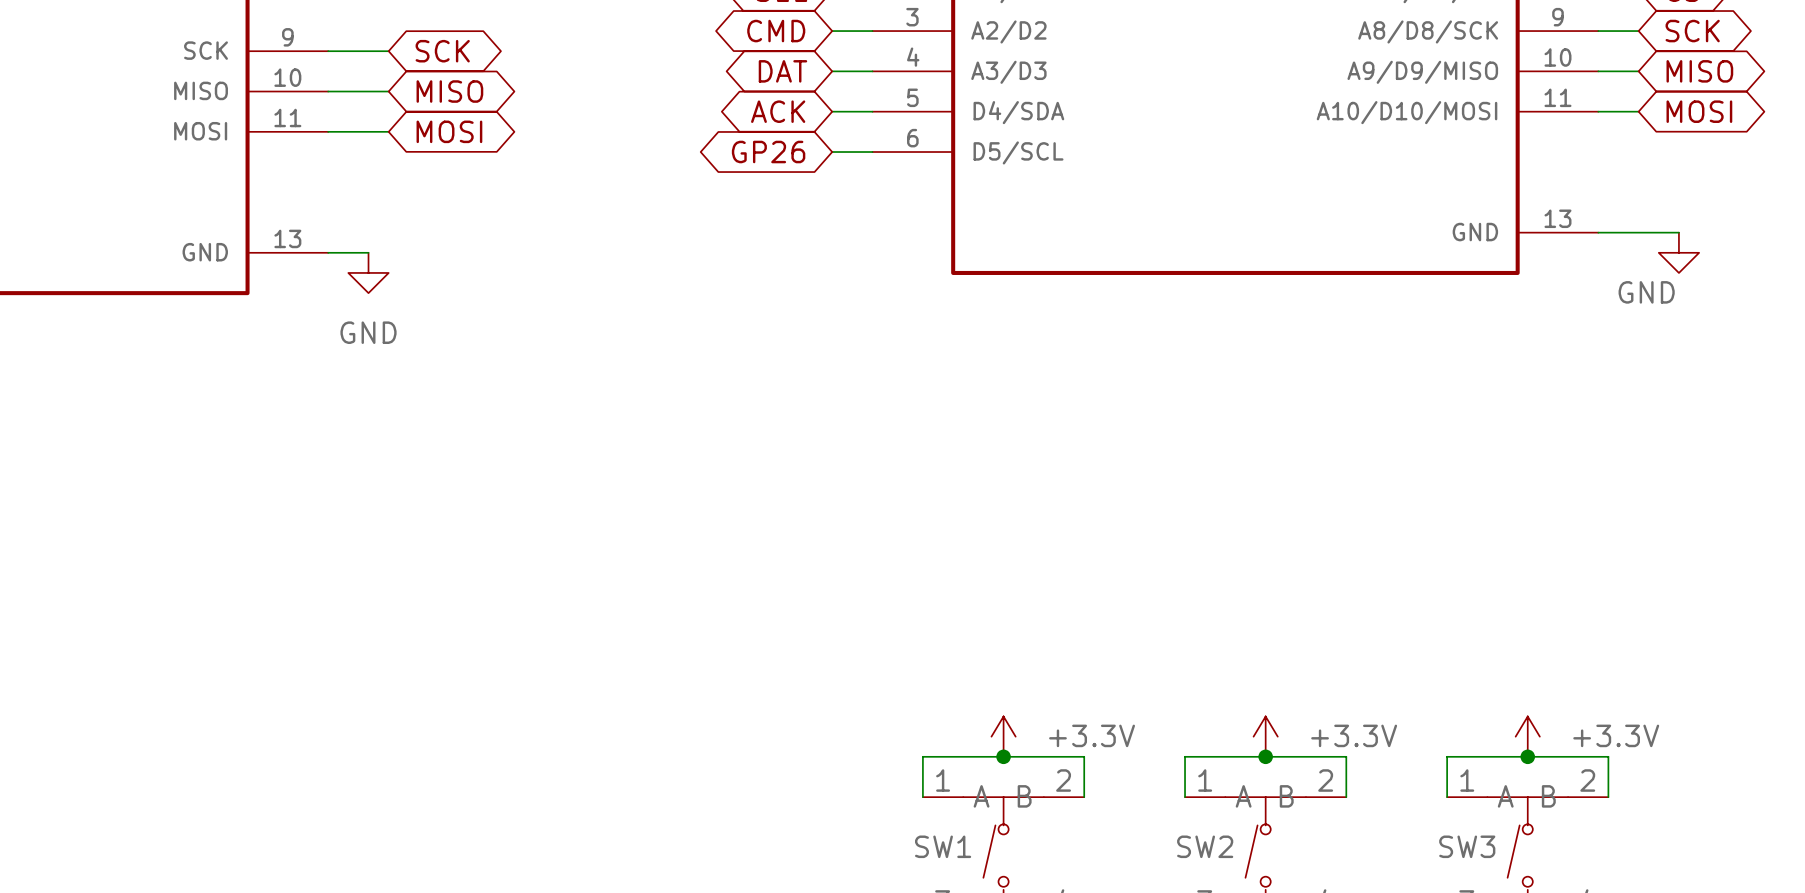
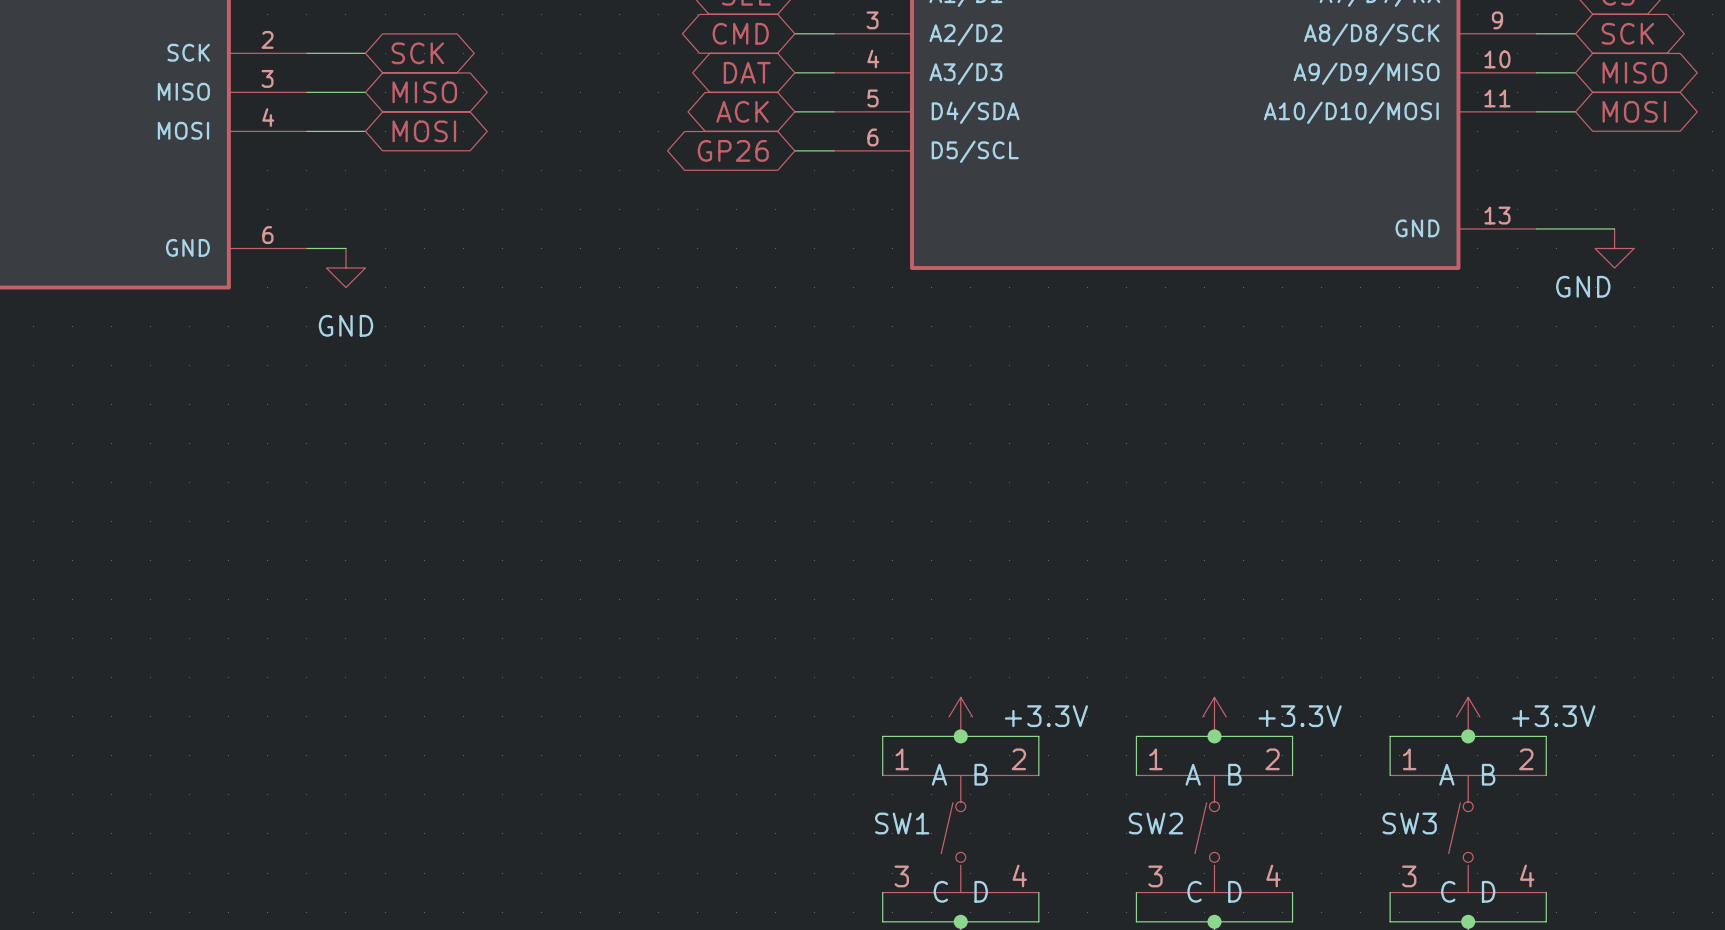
part pin number: 9 (287, 37) -> 2 (267, 39)
part pin number: 10 (287, 77) -> 3 (267, 78)
part pin number: 11 (287, 117) -> 4 (268, 117)
part pin number: 13 (287, 238) -> 6 (267, 235)

